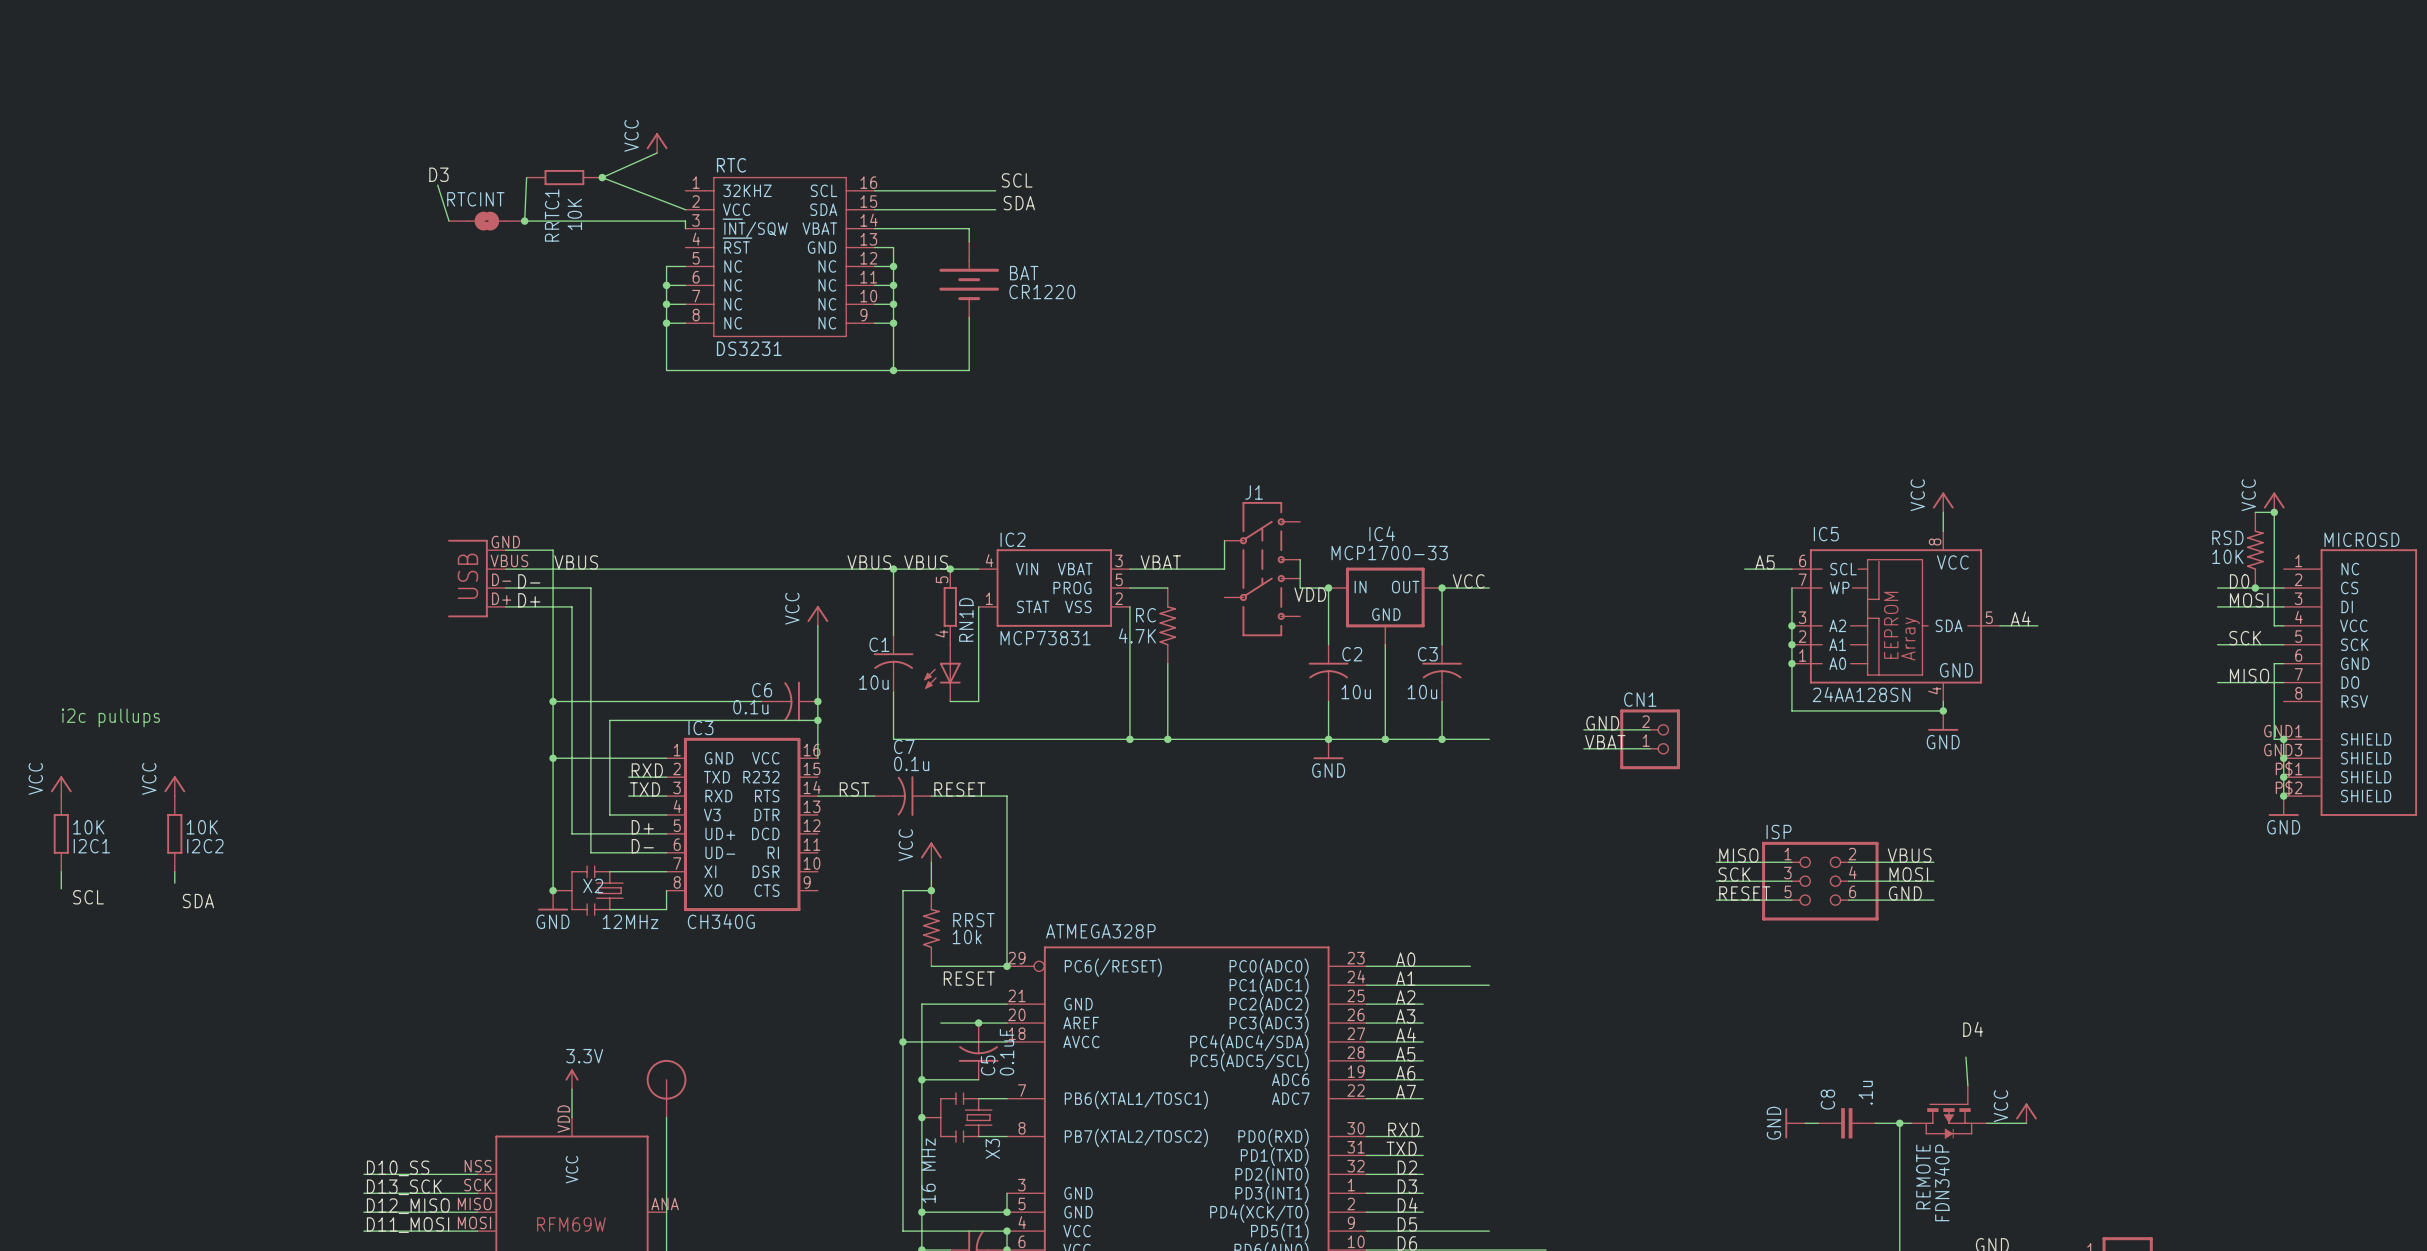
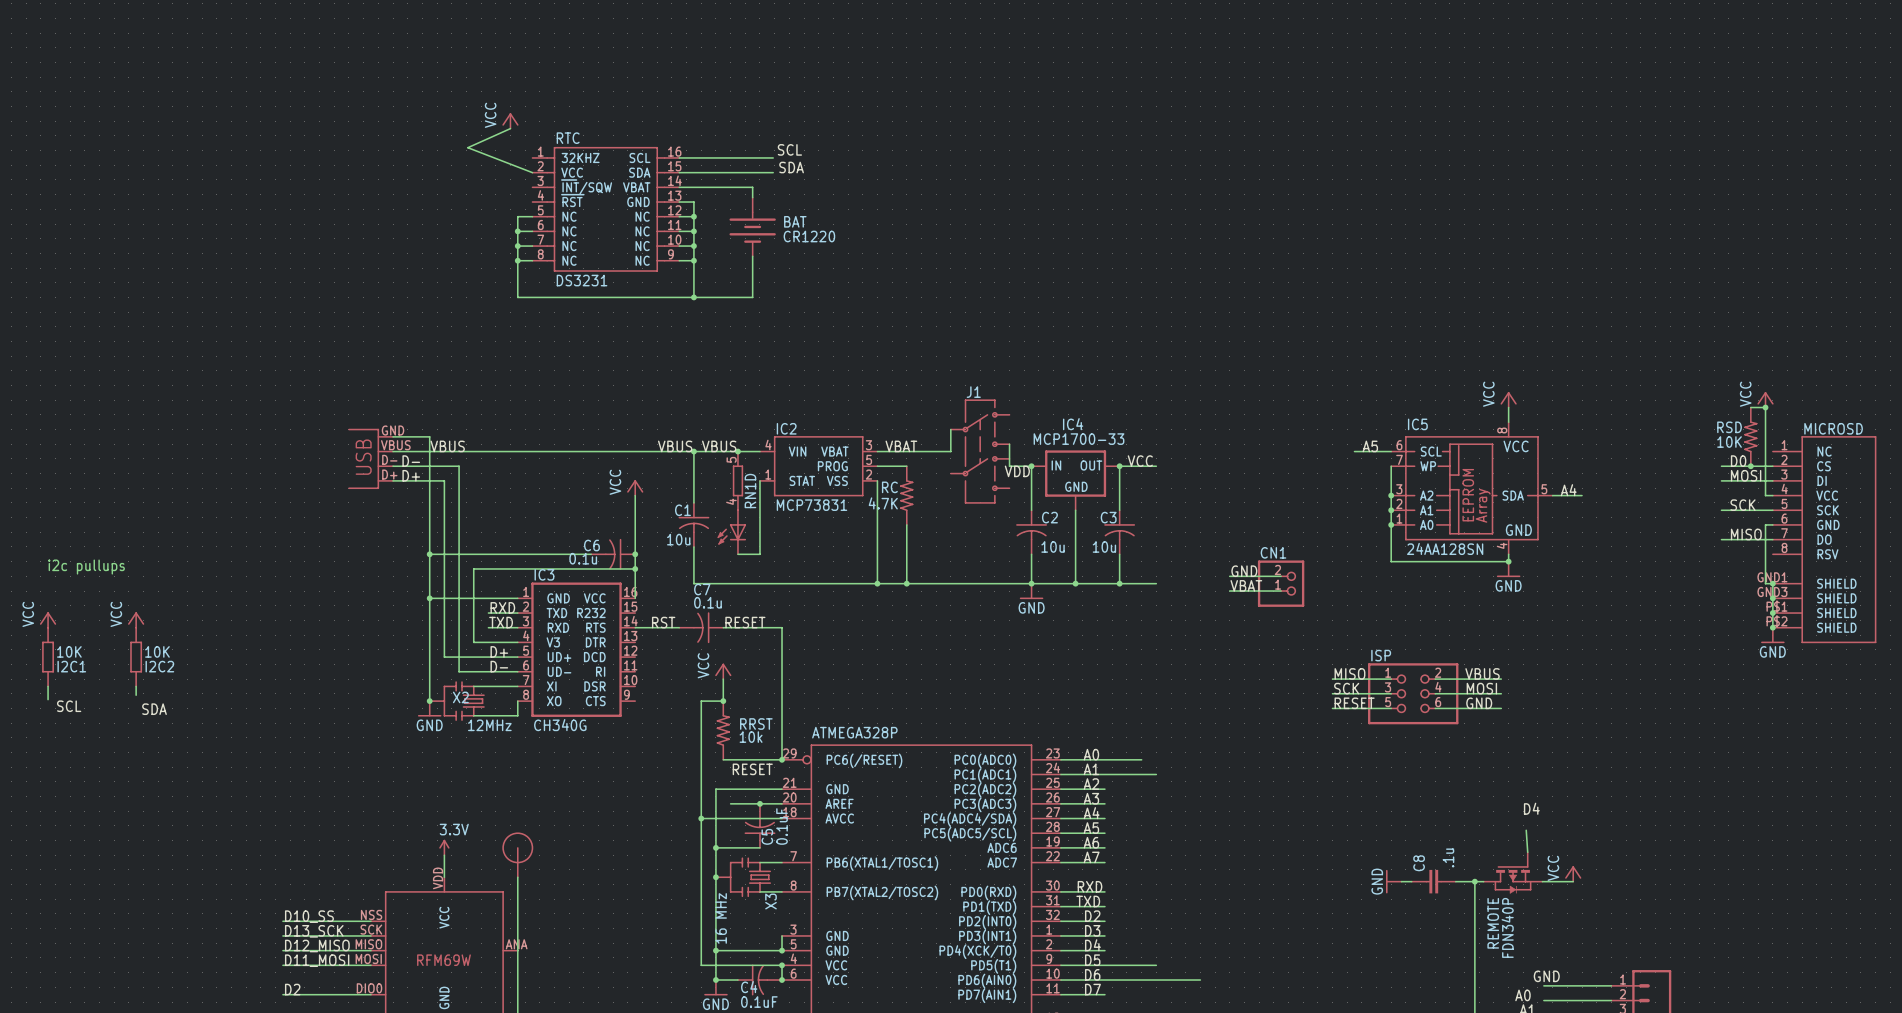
label: D3 (438, 174) -> none
wire: (526, 177) (524, 221) (685, 221) (685, 228) -> none
RRTC1: 10K (564, 177) -> none
junction: (602, 177) -> none
wire: (437, 185) (449, 221) -> none
RTCINT: (486, 221) -> none
junction: (524, 221) -> none

